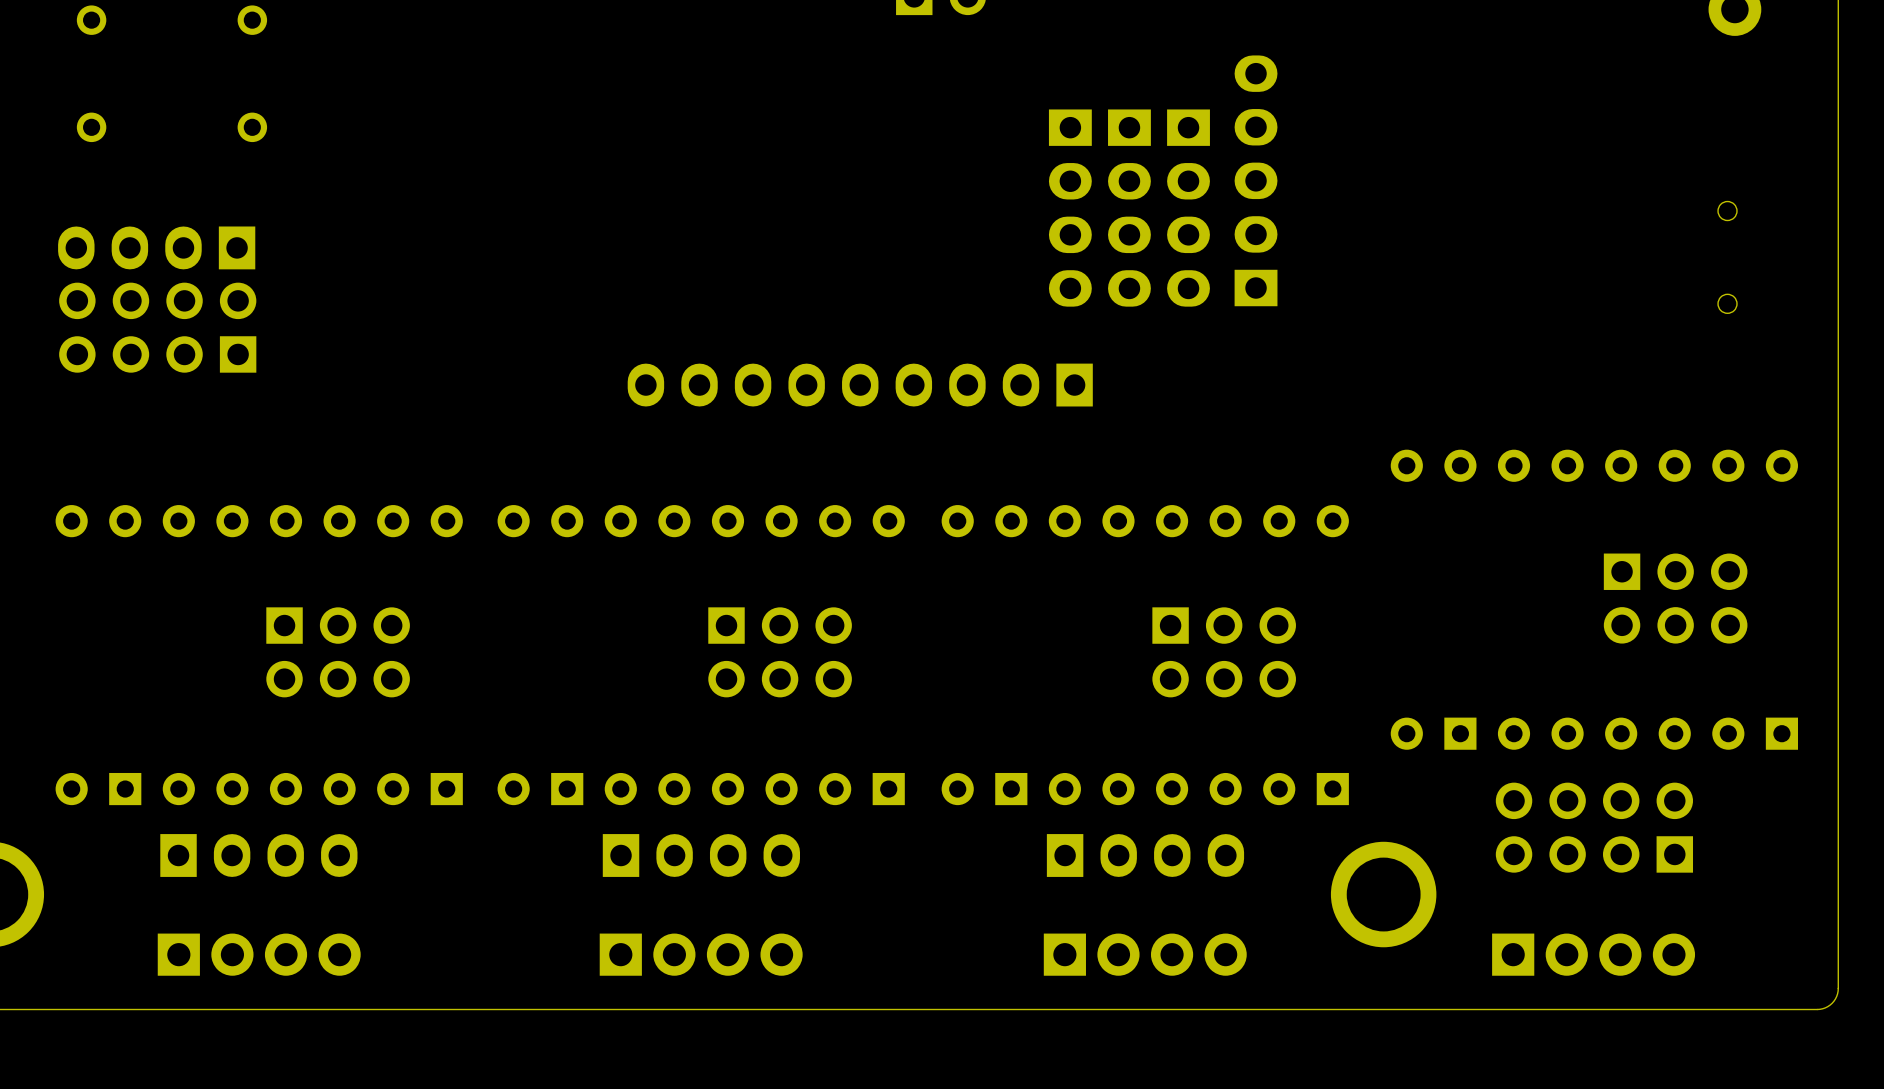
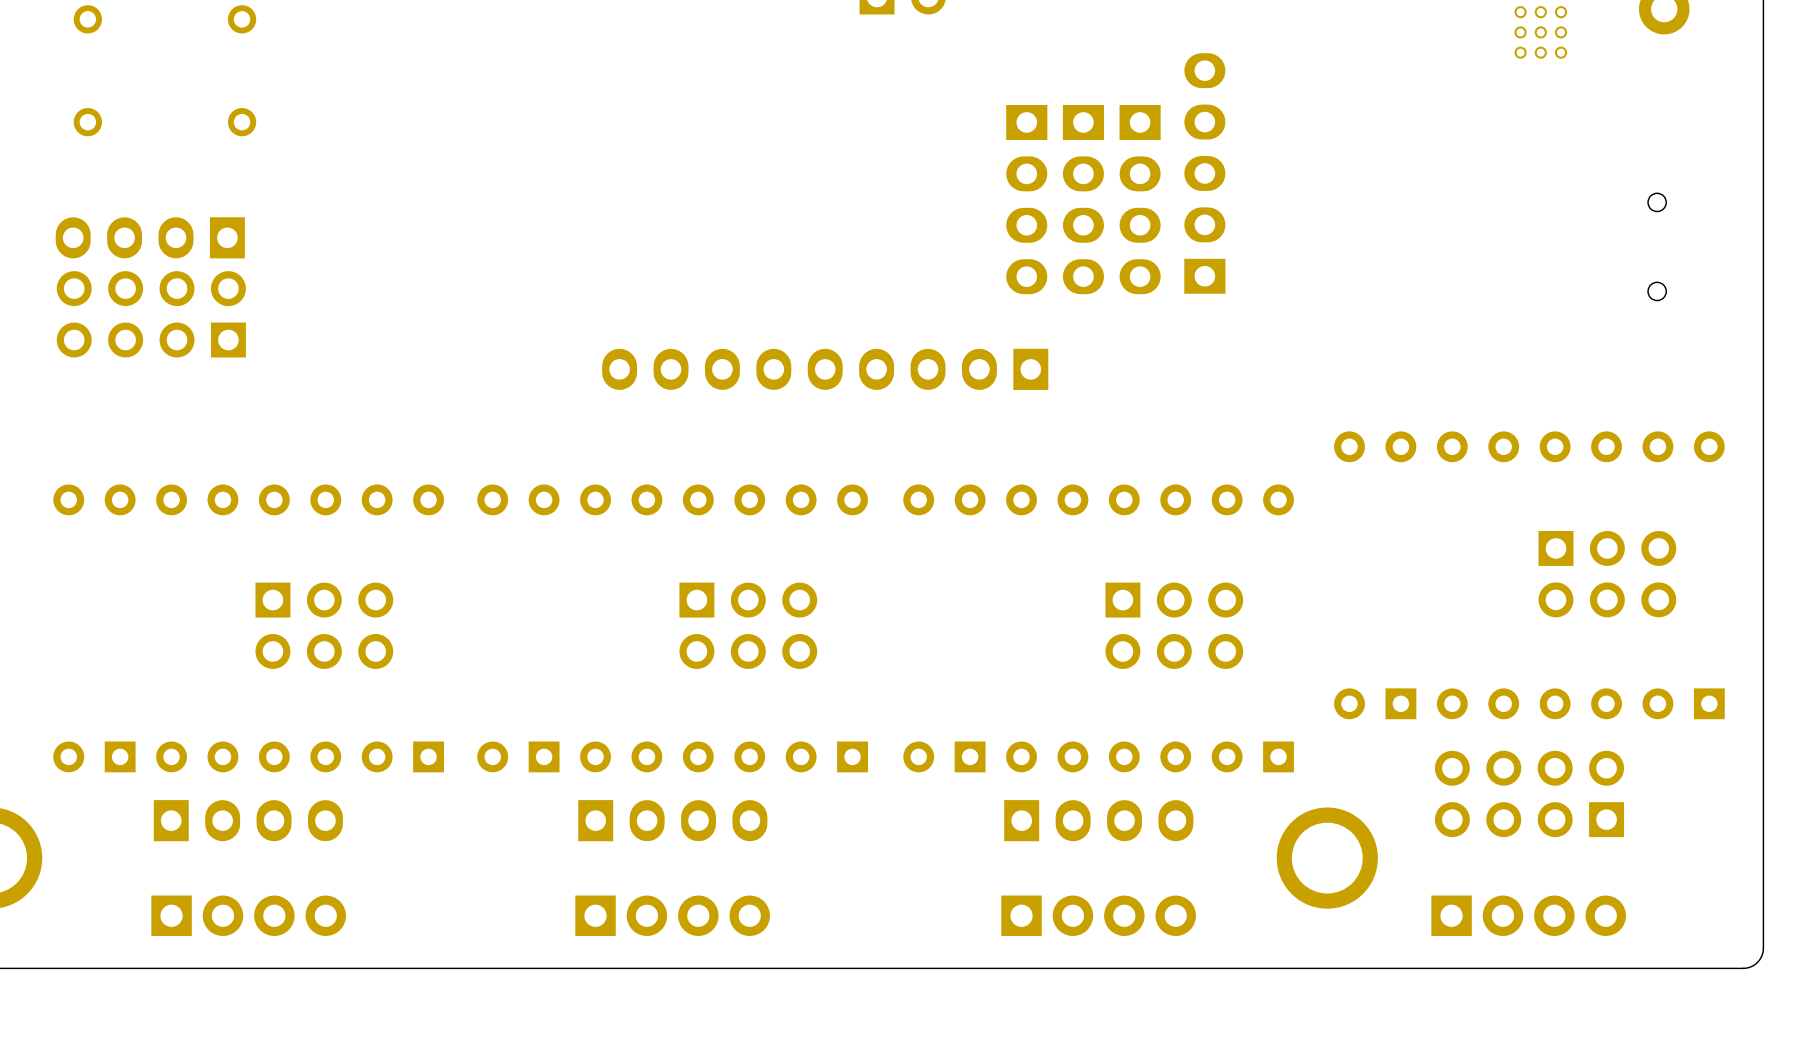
part: none -> (1520, 12)
part: none -> (1540, 12)
part: none -> (1561, 12)
part: none -> (1520, 32)
part: none -> (1540, 32)
part: none -> (1561, 32)
part: none -> (1520, 52)
part: none -> (1540, 52)
part: none -> (1561, 52)

